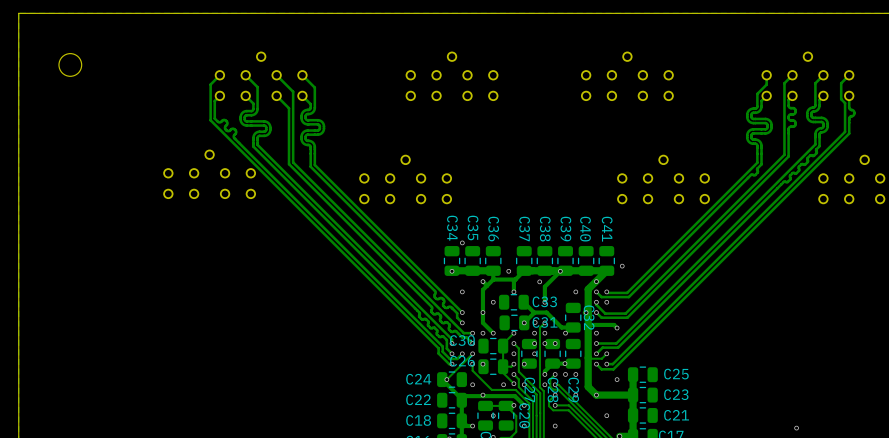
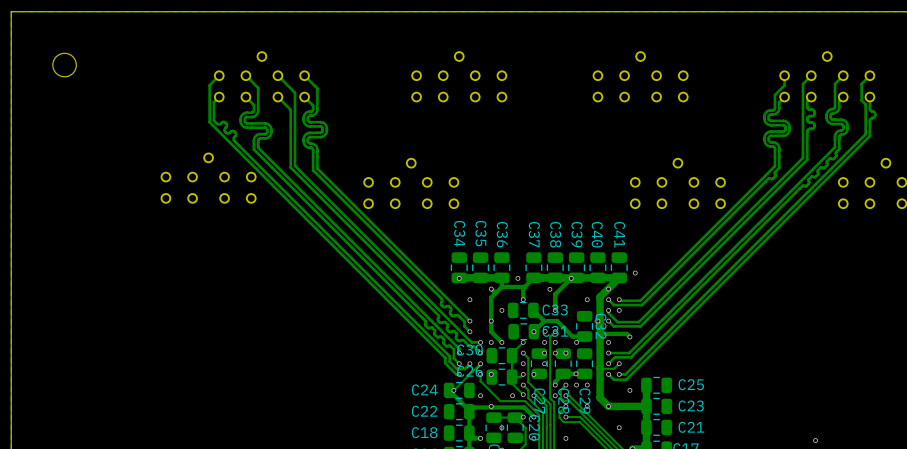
via: (462, 242) -> none

